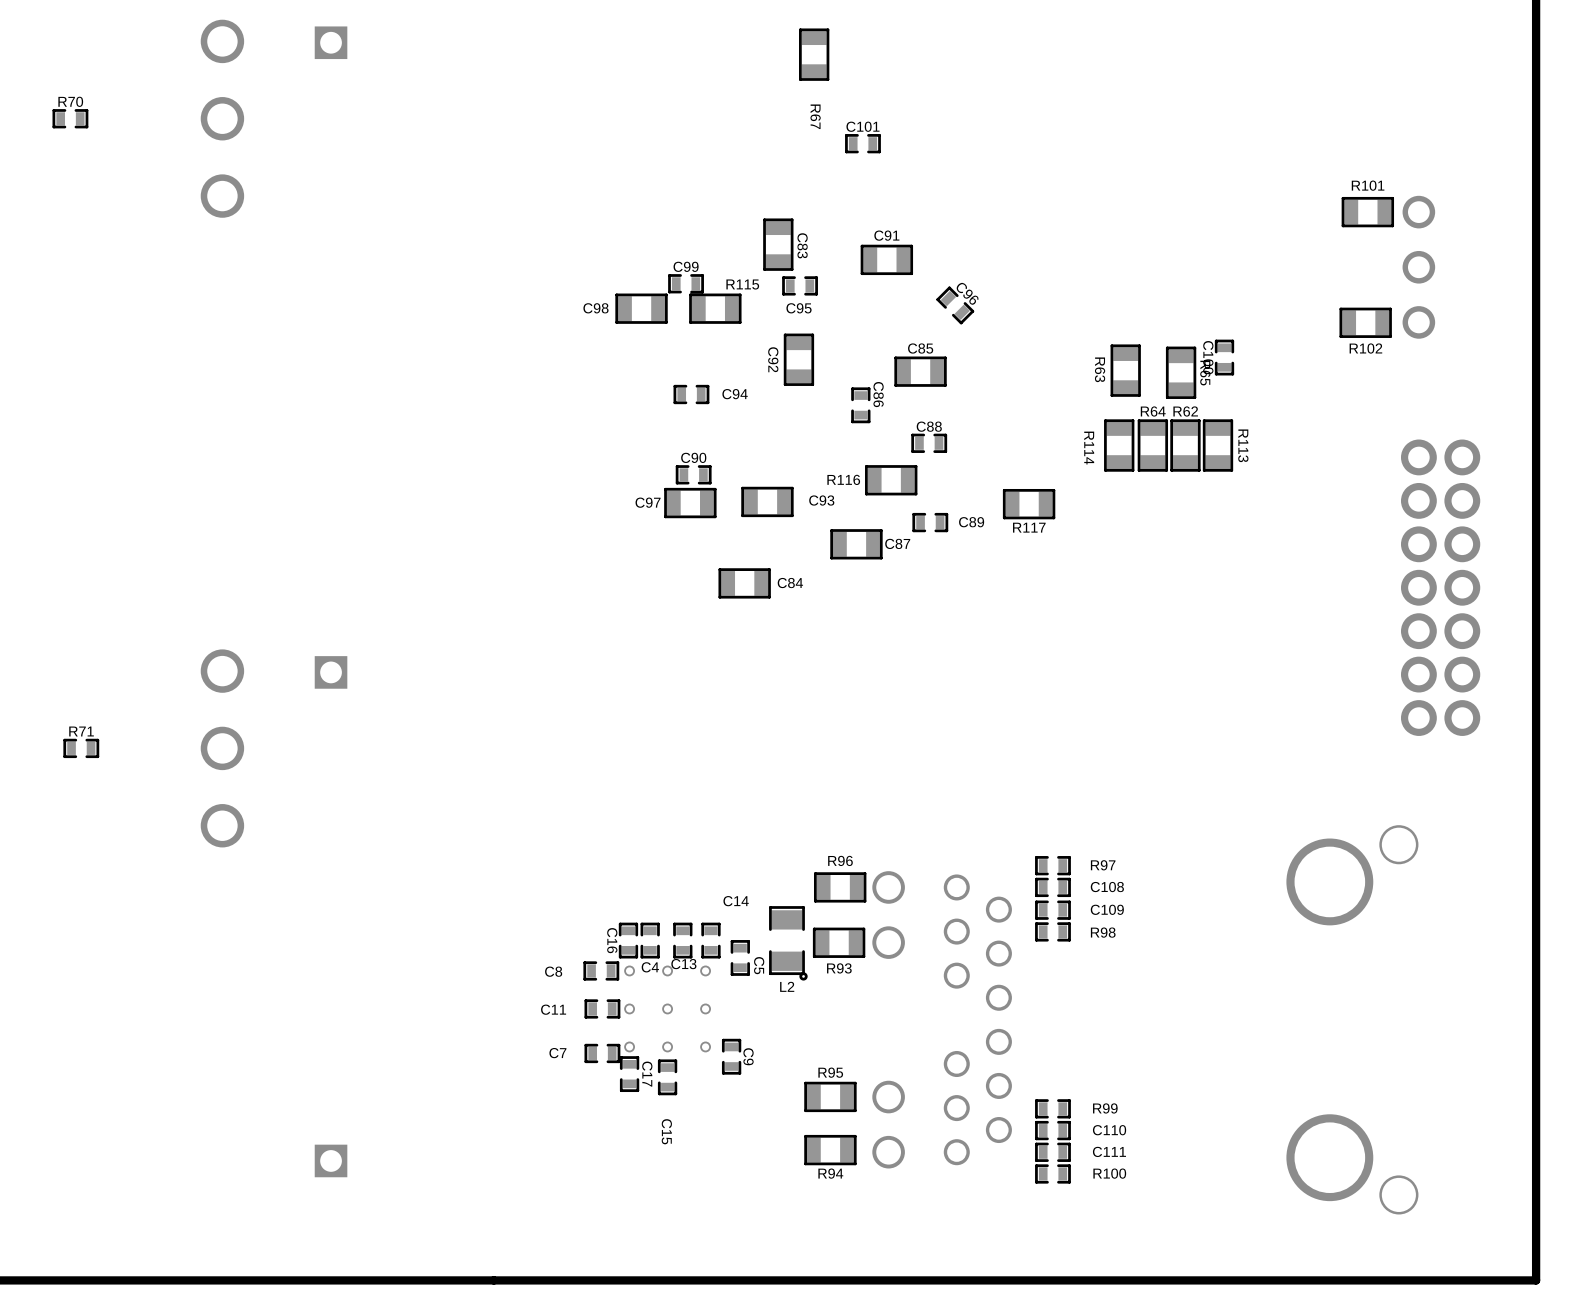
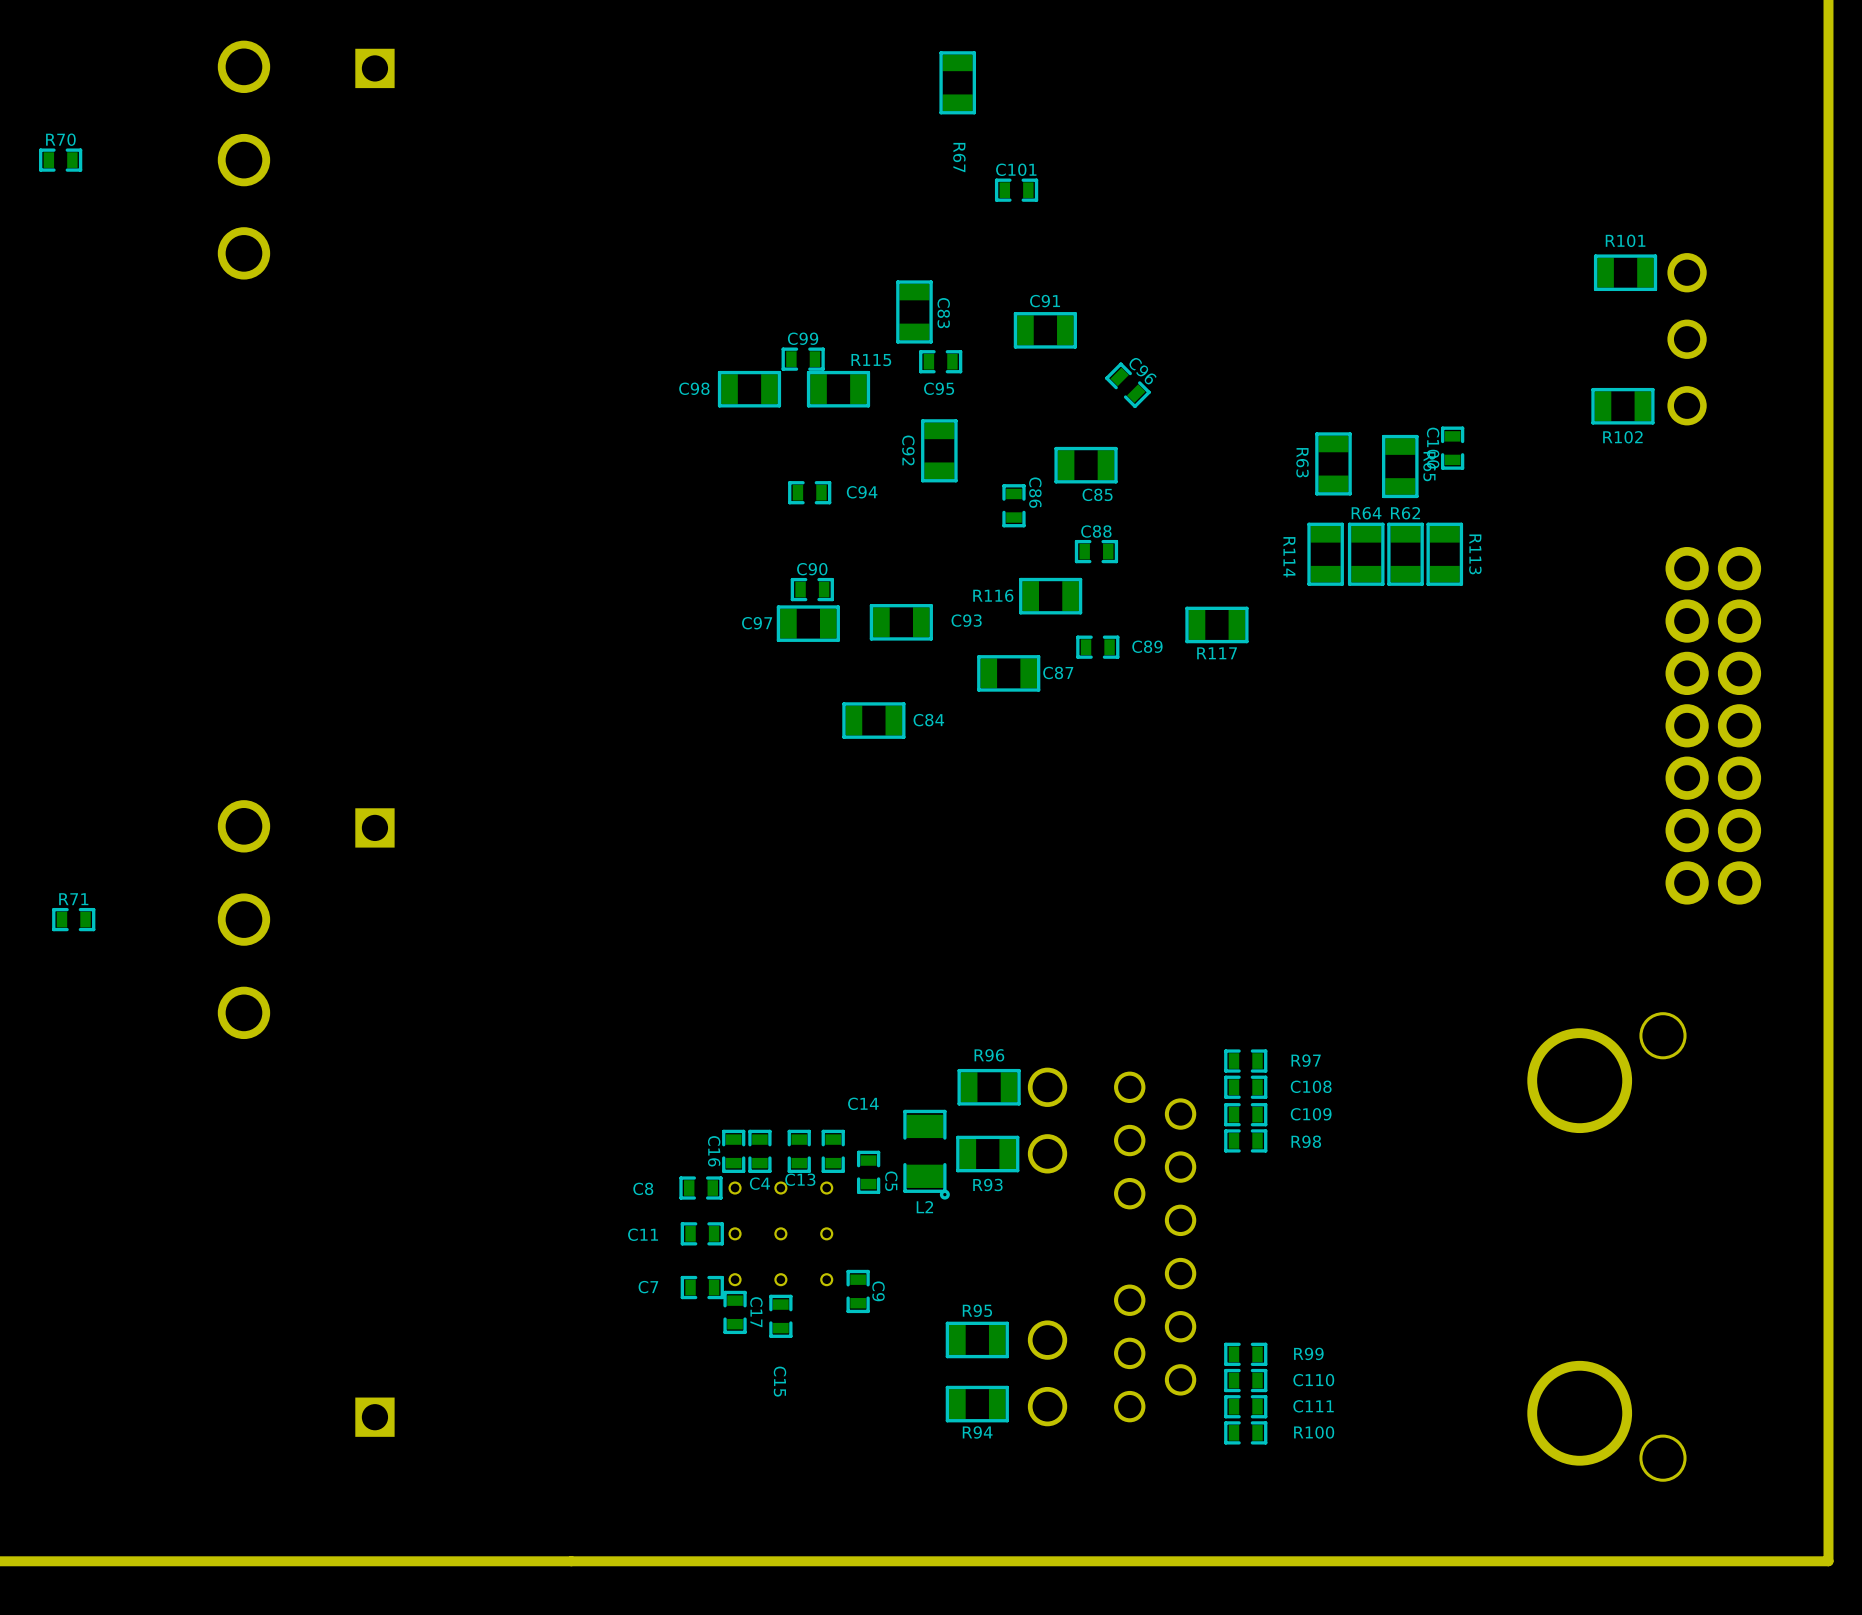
C85 name position: C85 (920, 348) -> C85 (1097, 494)

